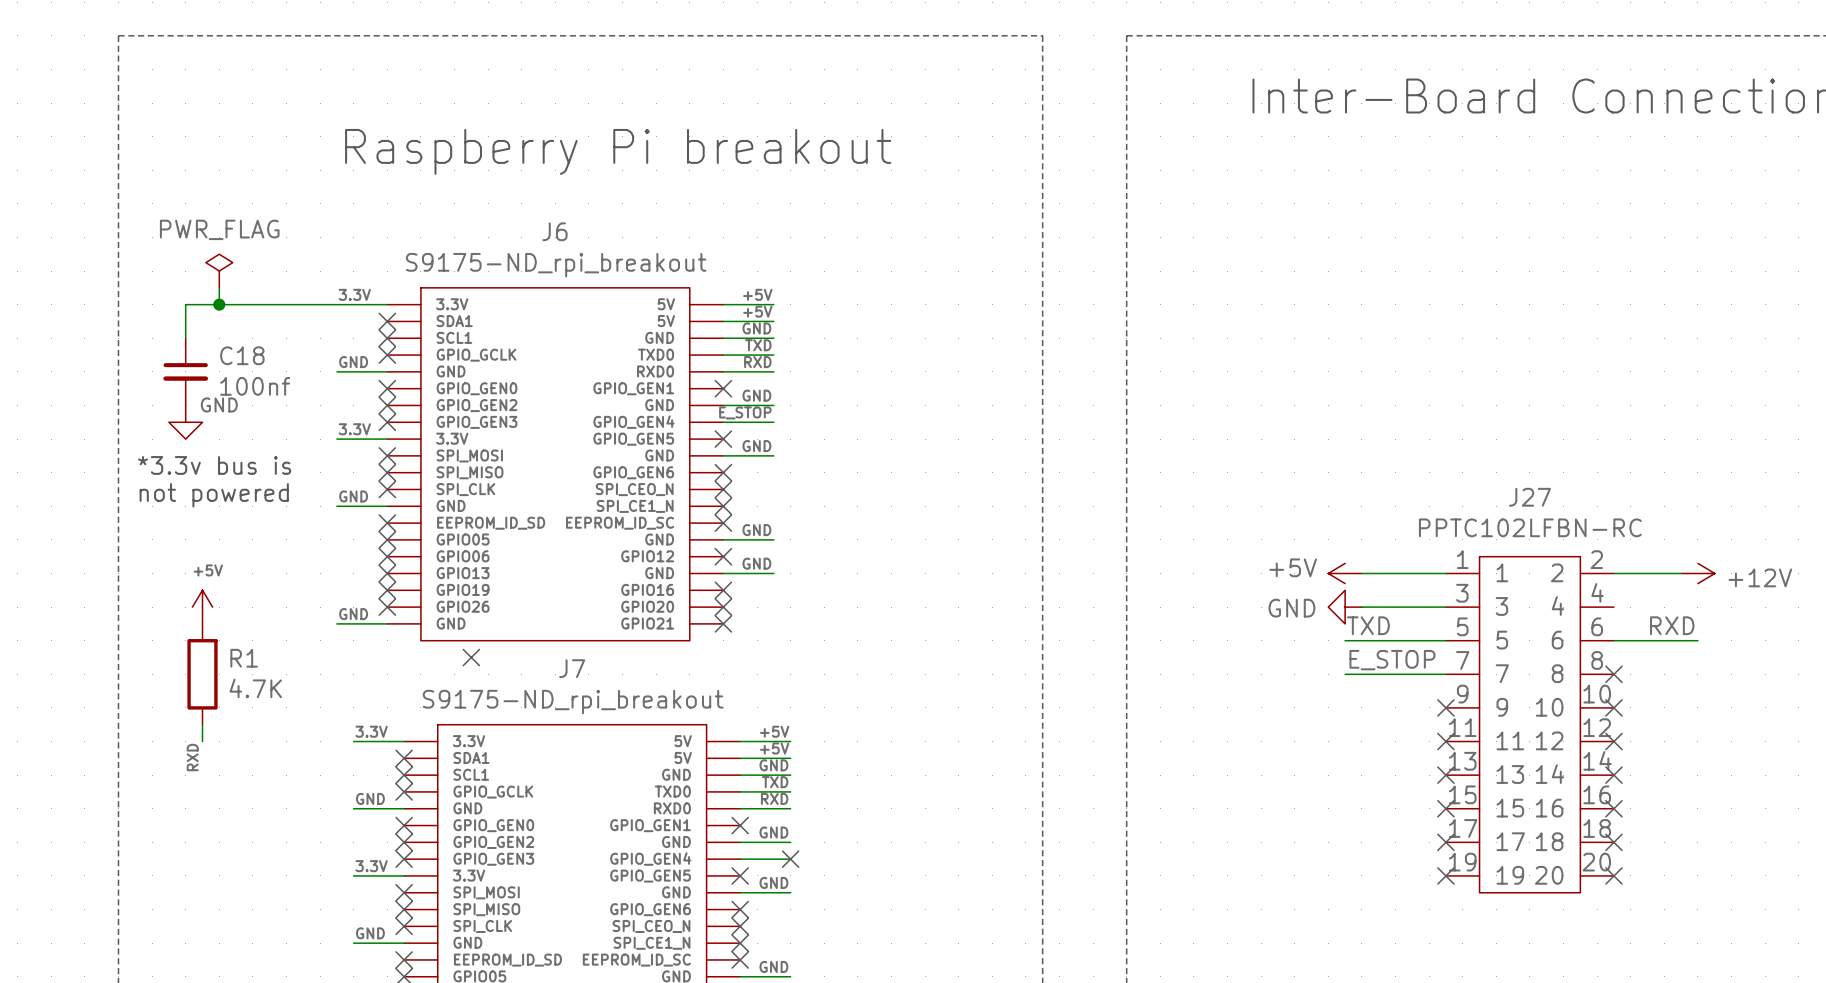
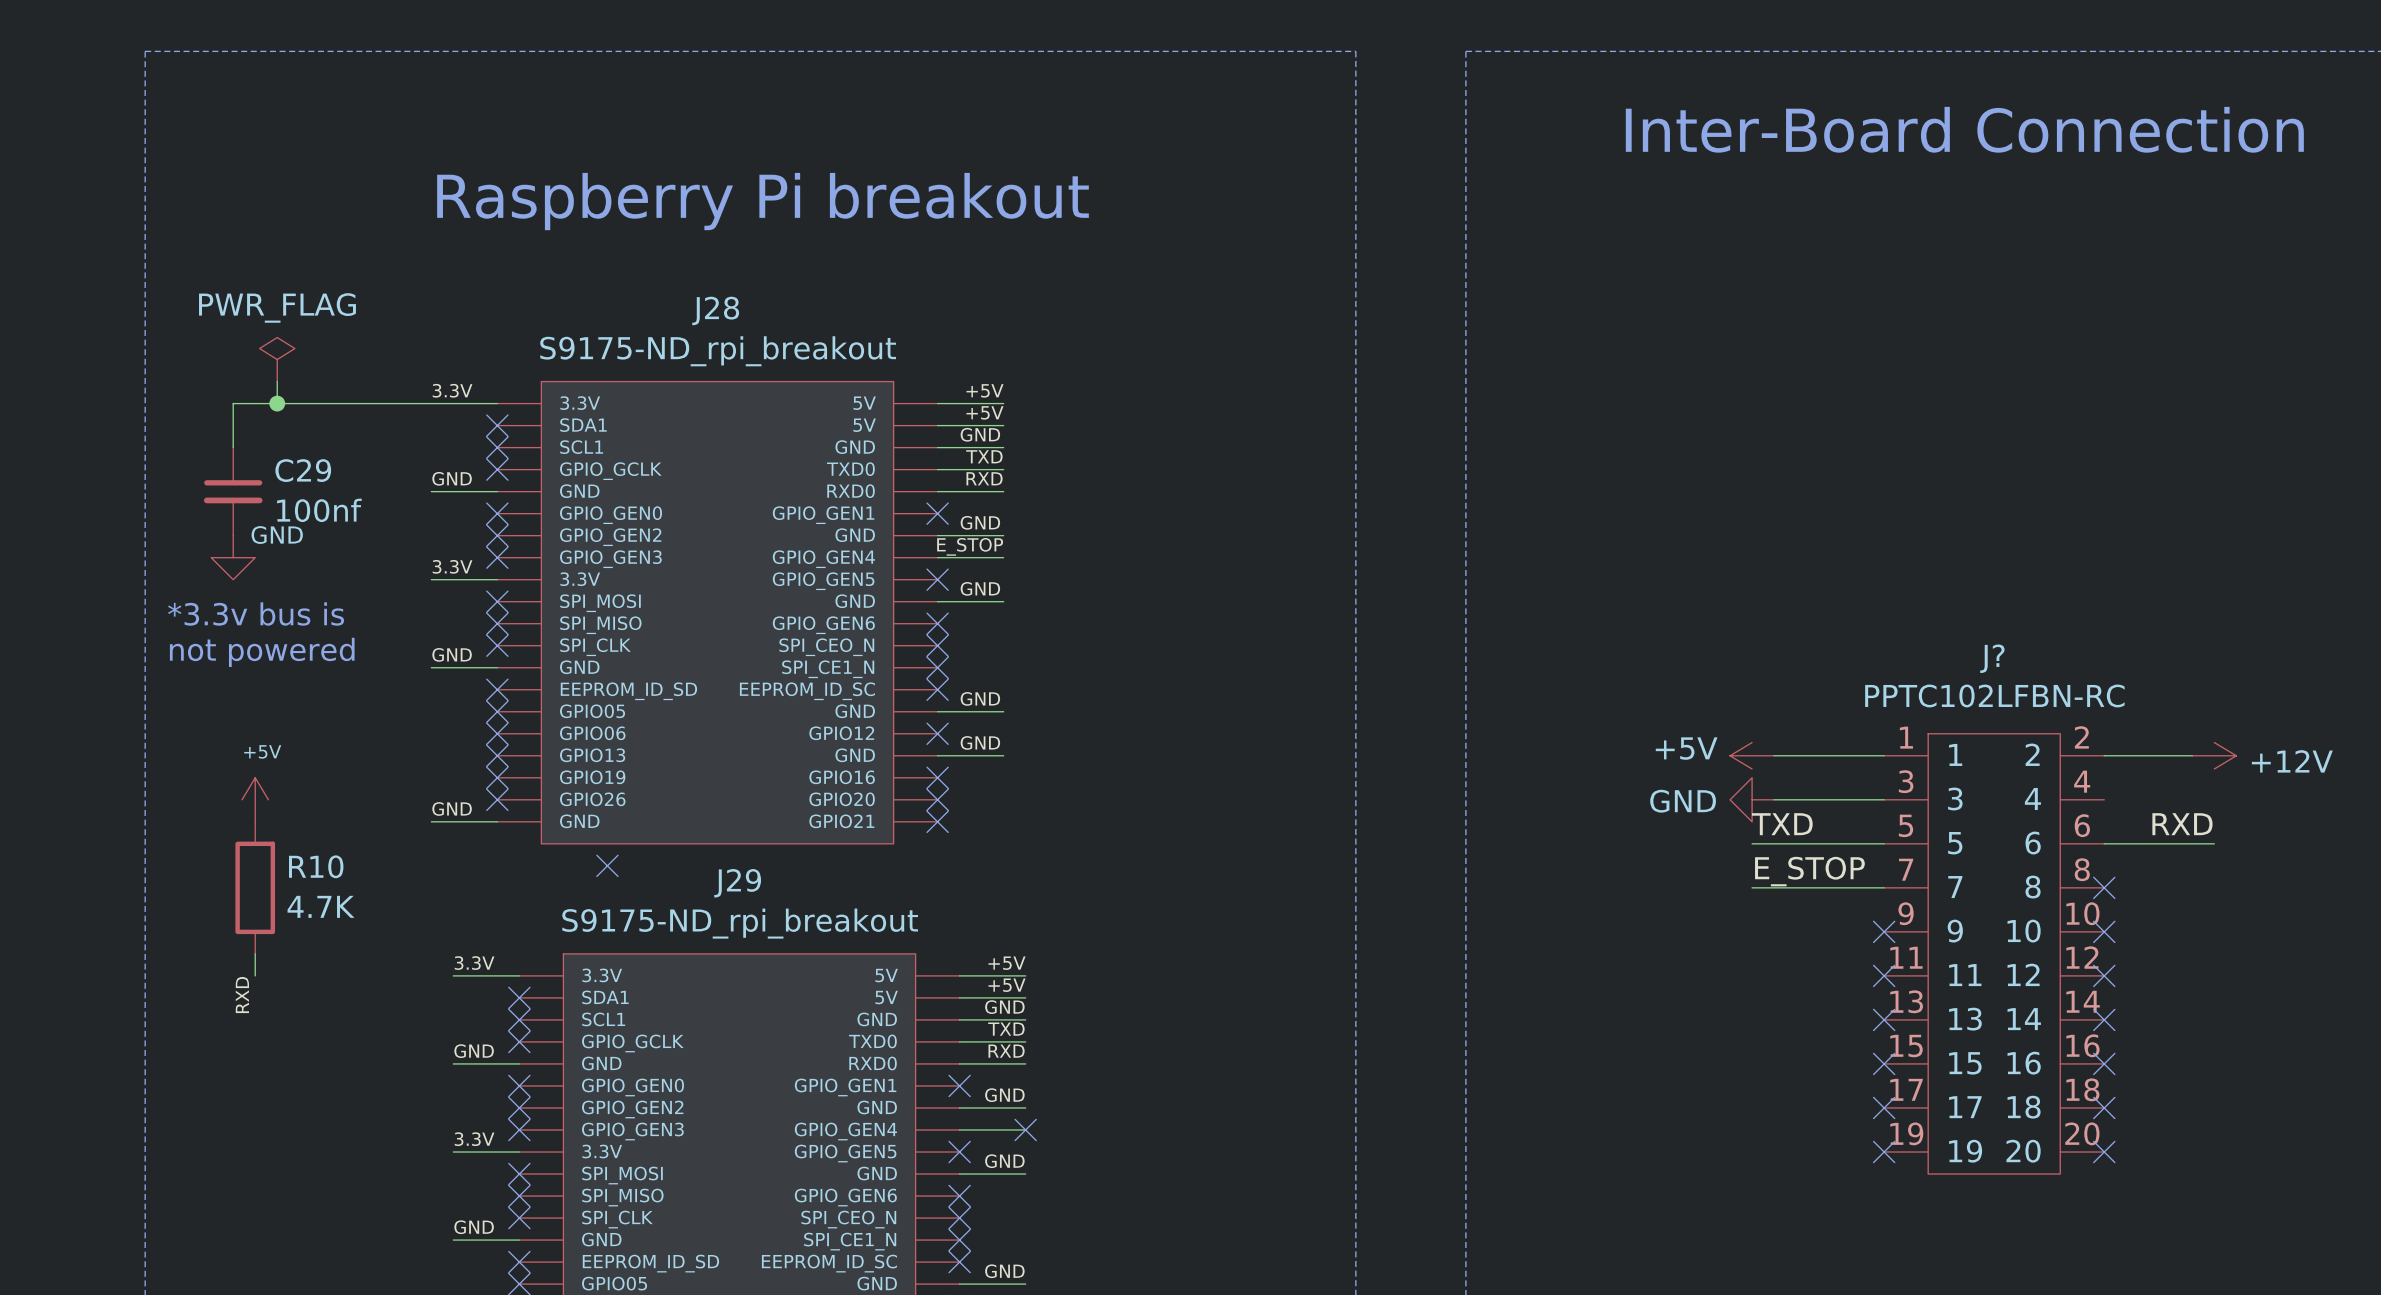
J6 name: J6 (554, 231) -> J28 (715, 310)
C18 name: C18 (242, 355) -> C29 (303, 470)
J27 name: J27 (1529, 497) -> J? (1992, 658)
R1 name: R1 (244, 658) -> R10 (316, 866)
J7 name: J7 (572, 668) -> J29 (737, 883)

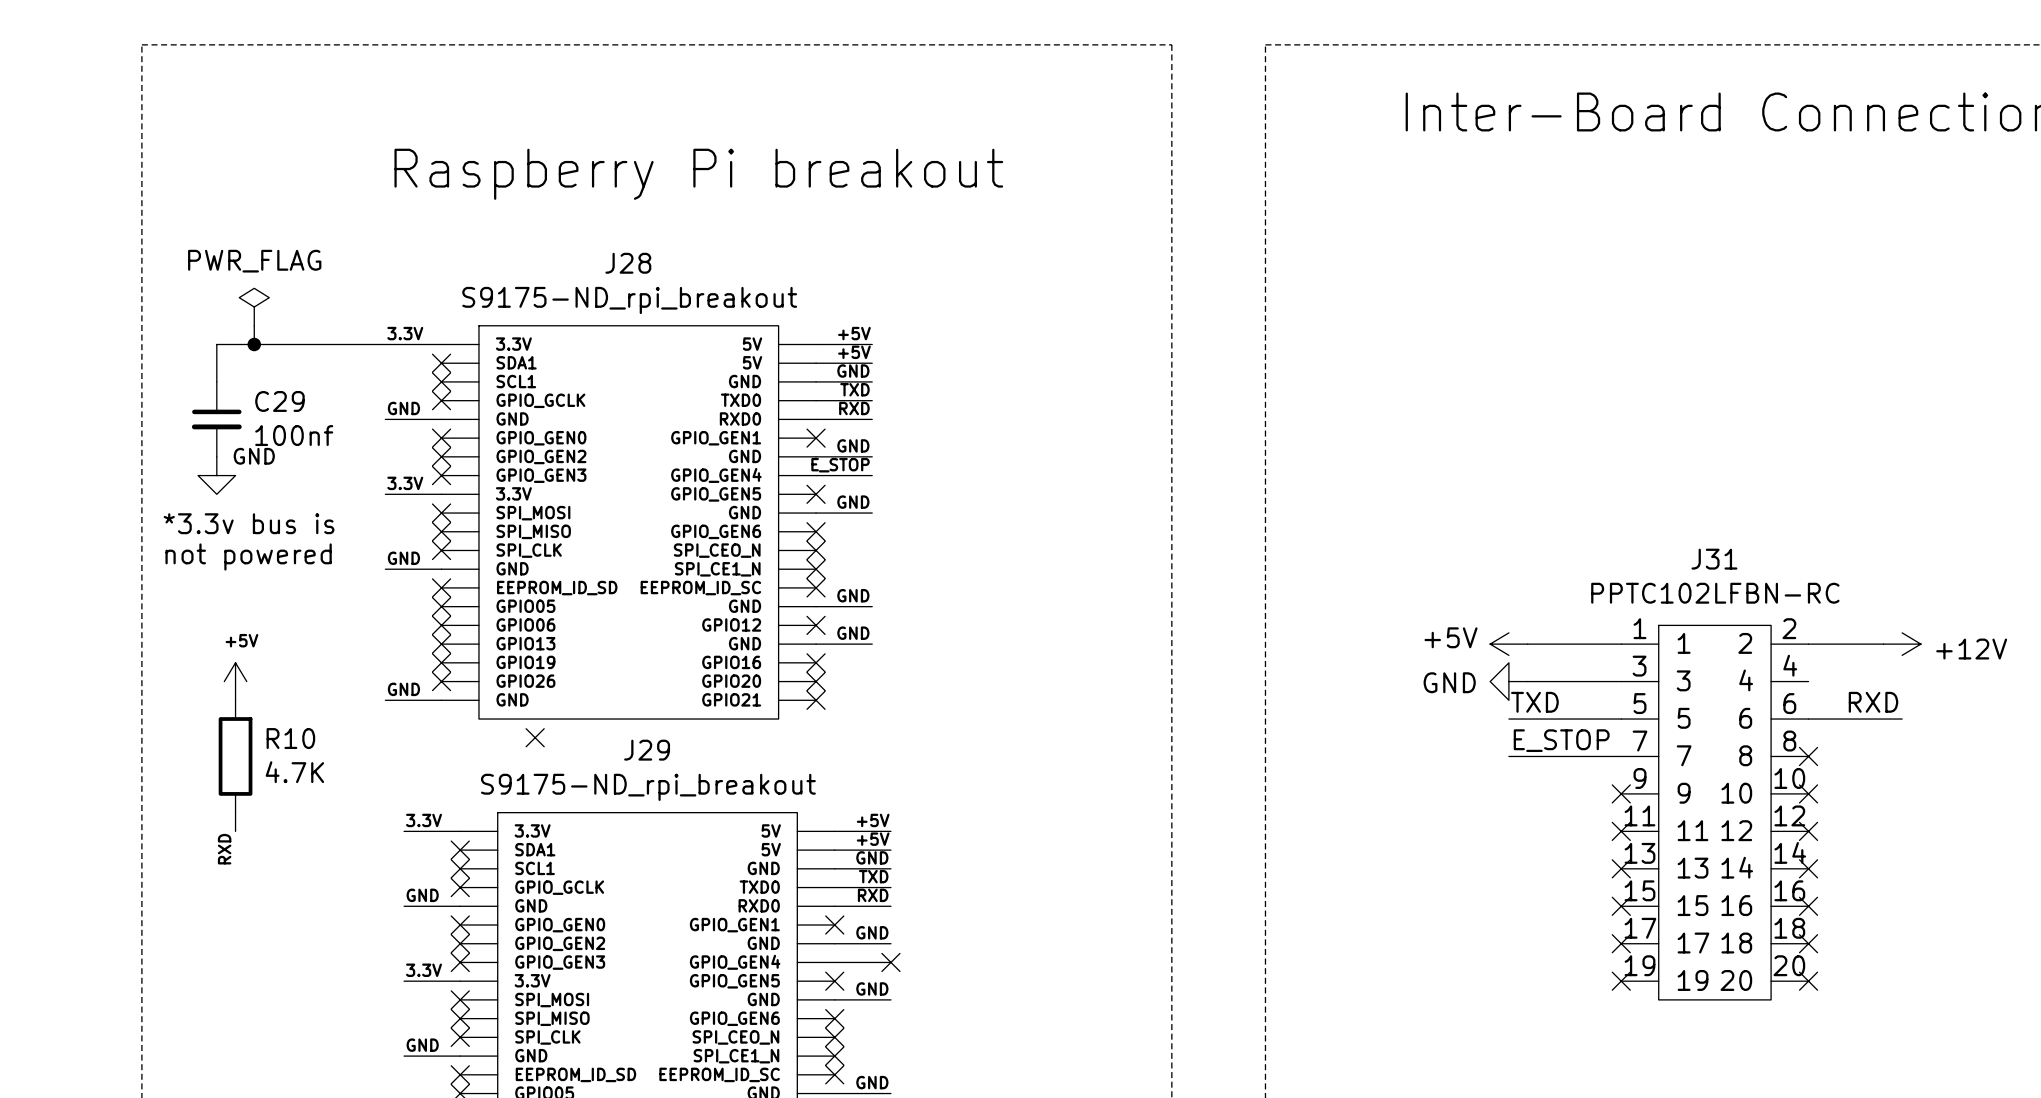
J? name: J? (1992, 658) -> J31 (1714, 559)

